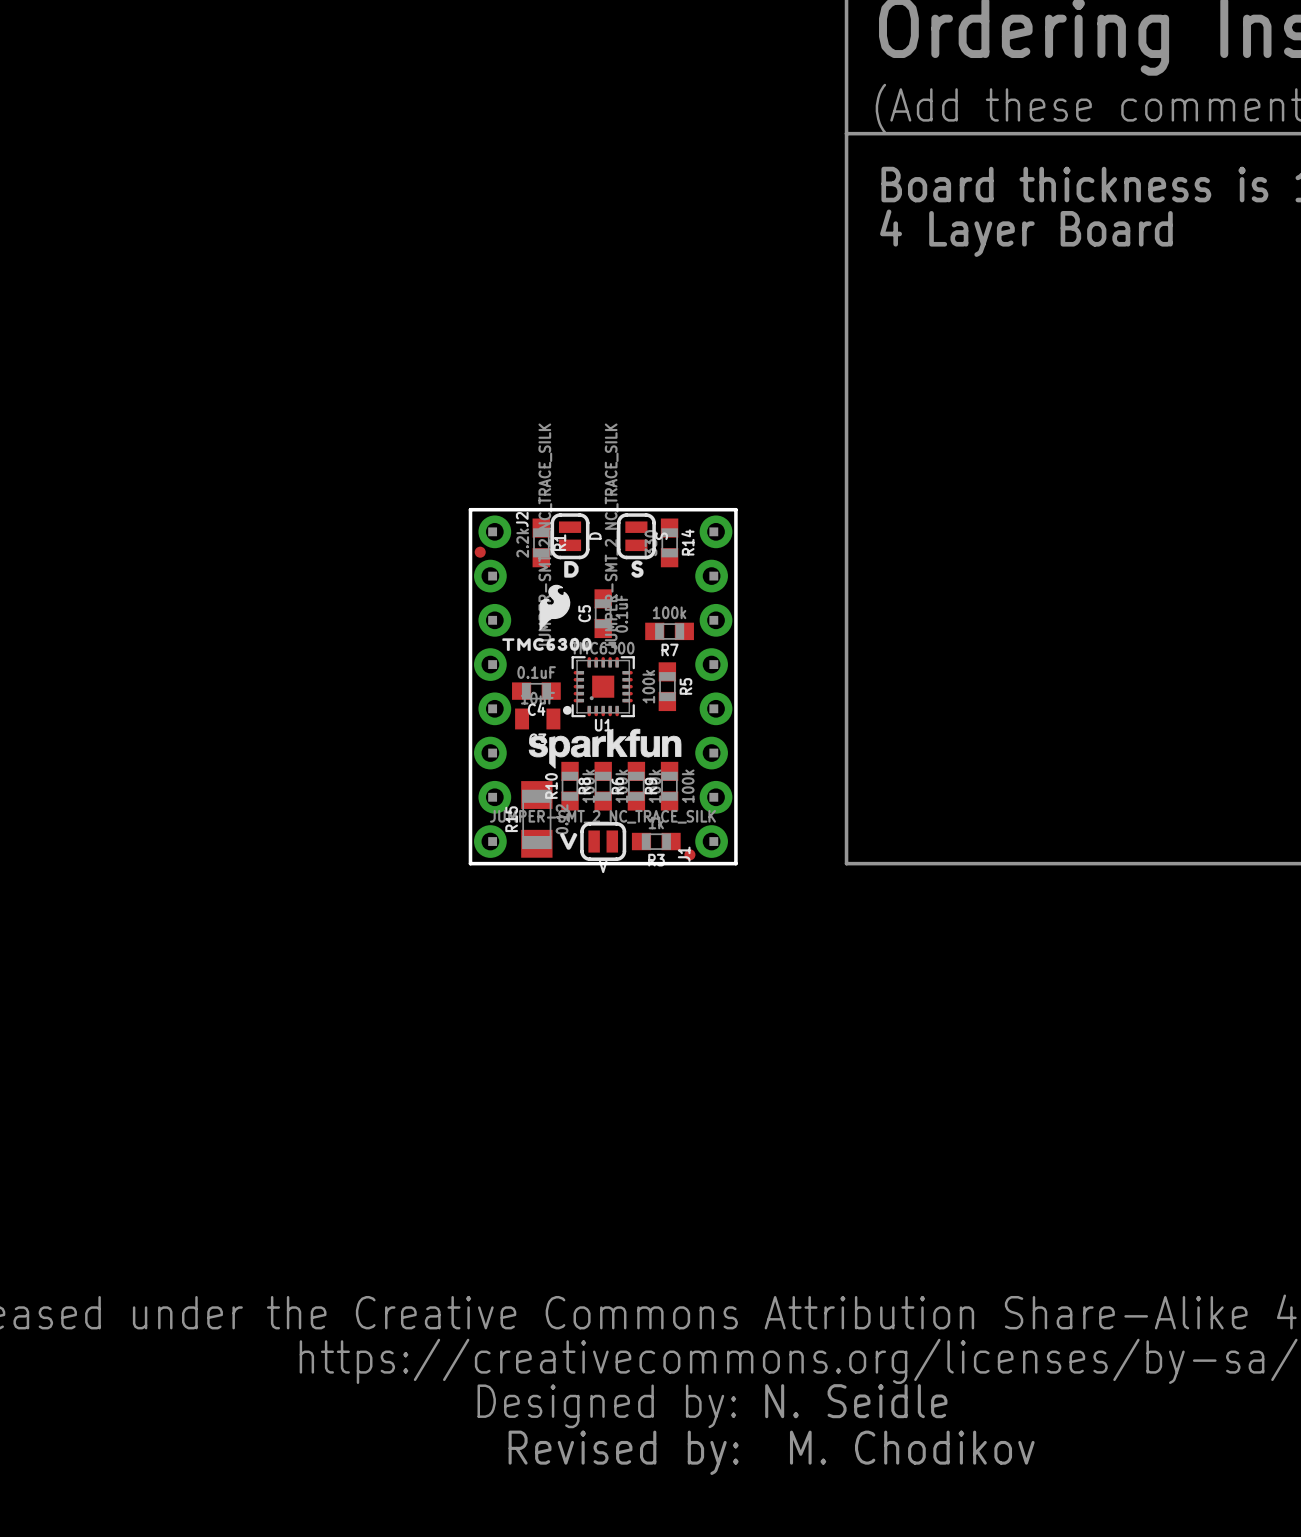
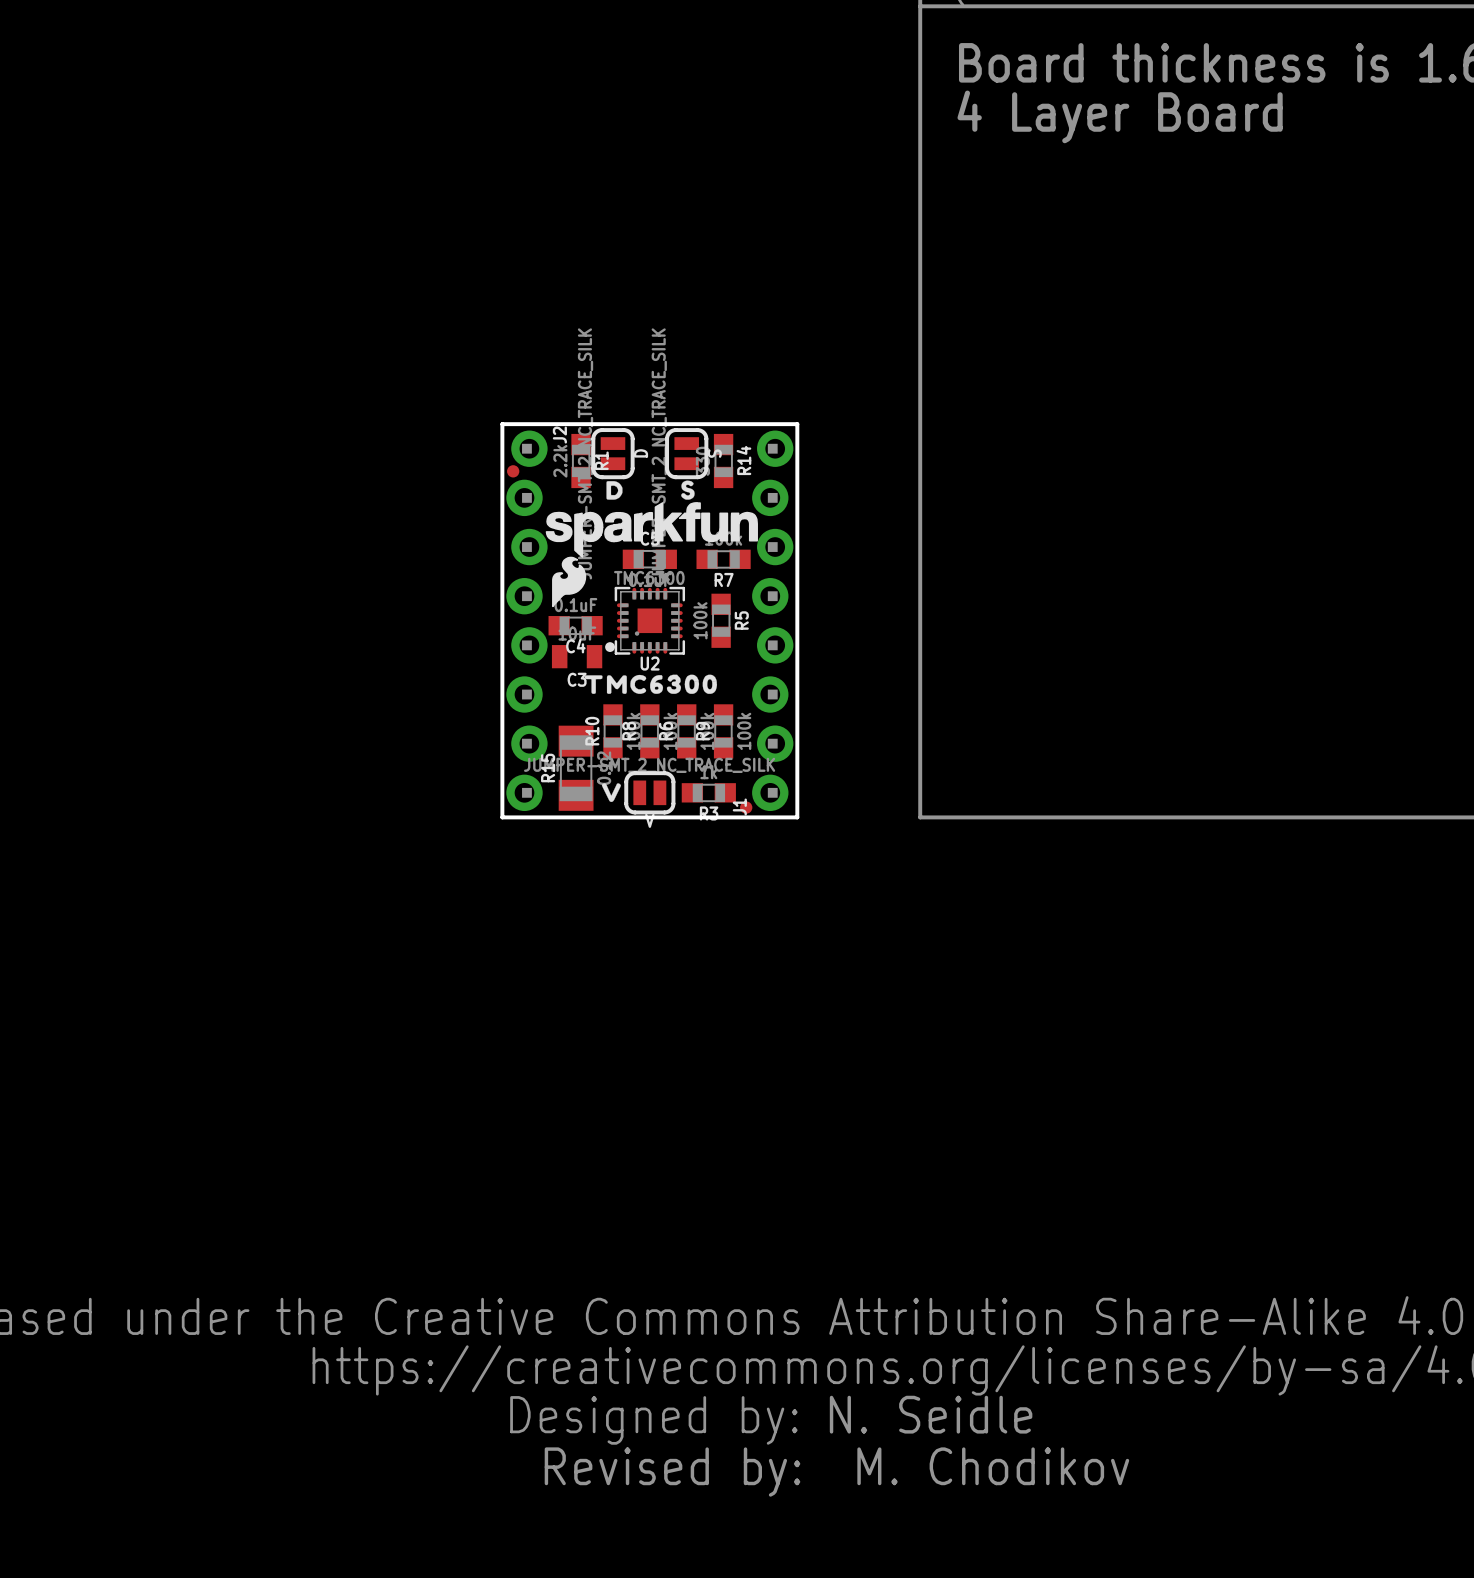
drawing: none -> [545, 502, 758, 558]
drawing position: (554, 607) -> (569, 581)
C5 rotation: 0° (603, 613) -> 90° clockwise (649, 559)
drawing: [502, 637, 592, 652] -> none
U1 name: U1 (603, 725) -> U2 (650, 663)
drawing shape: [528, 728, 682, 769] -> [584, 674, 718, 694]

